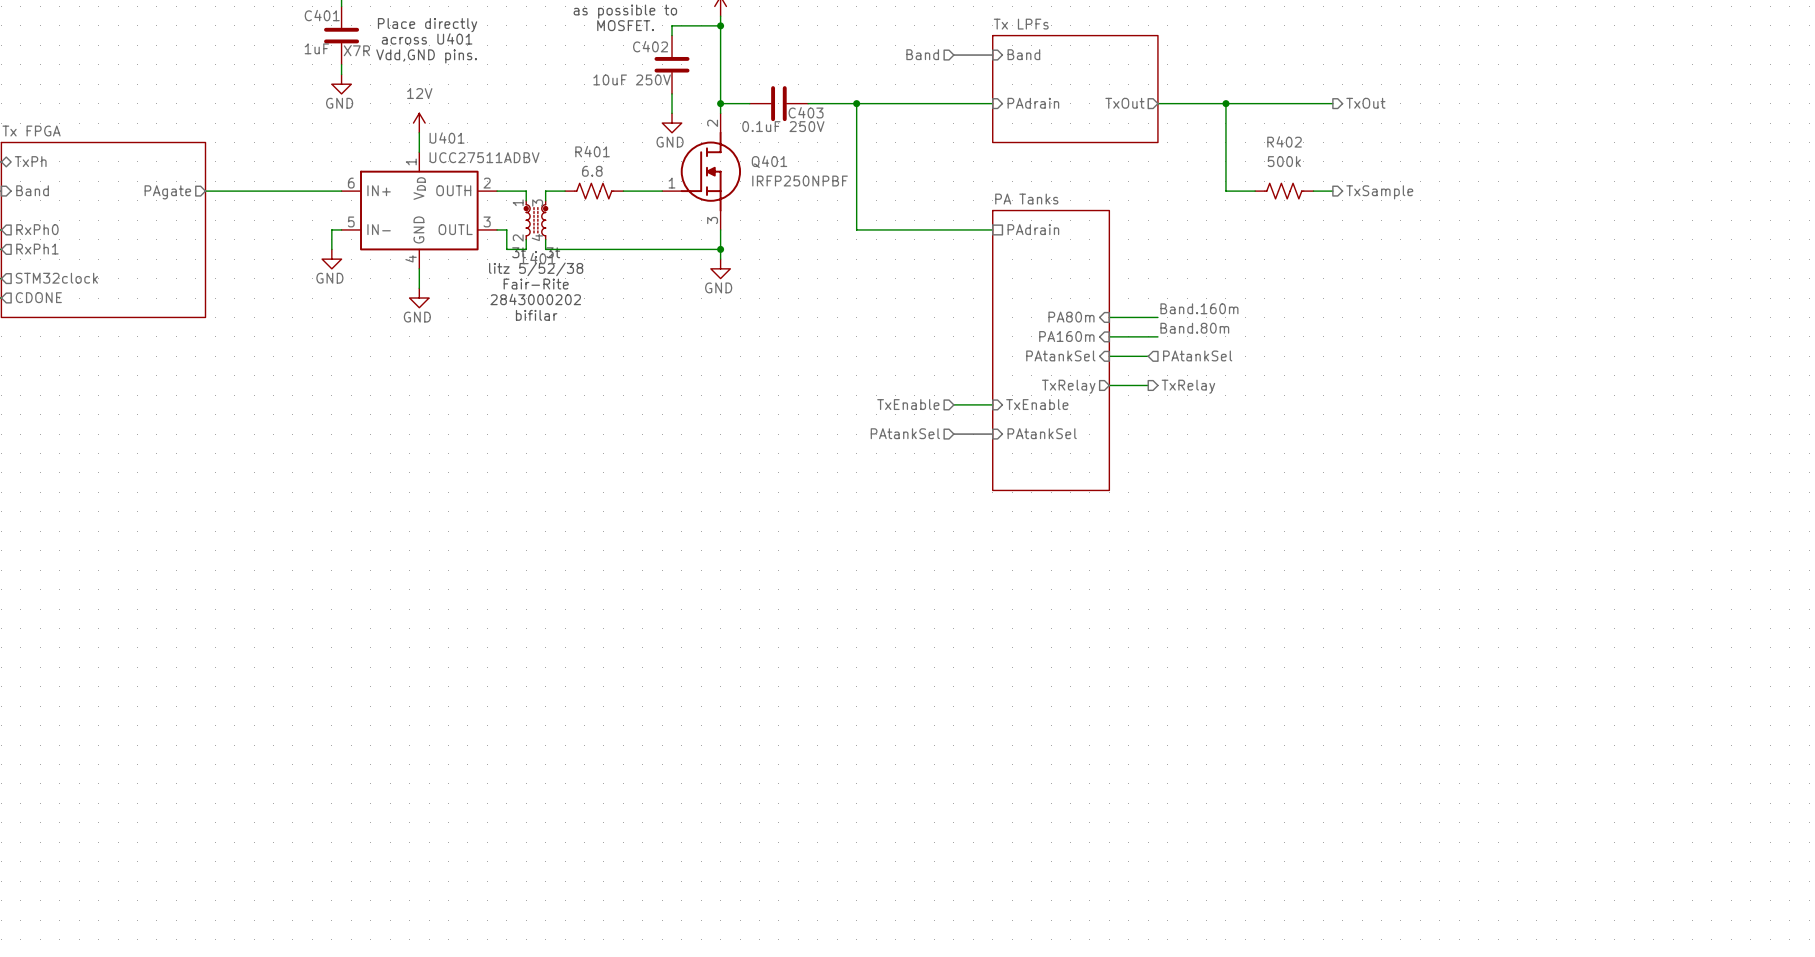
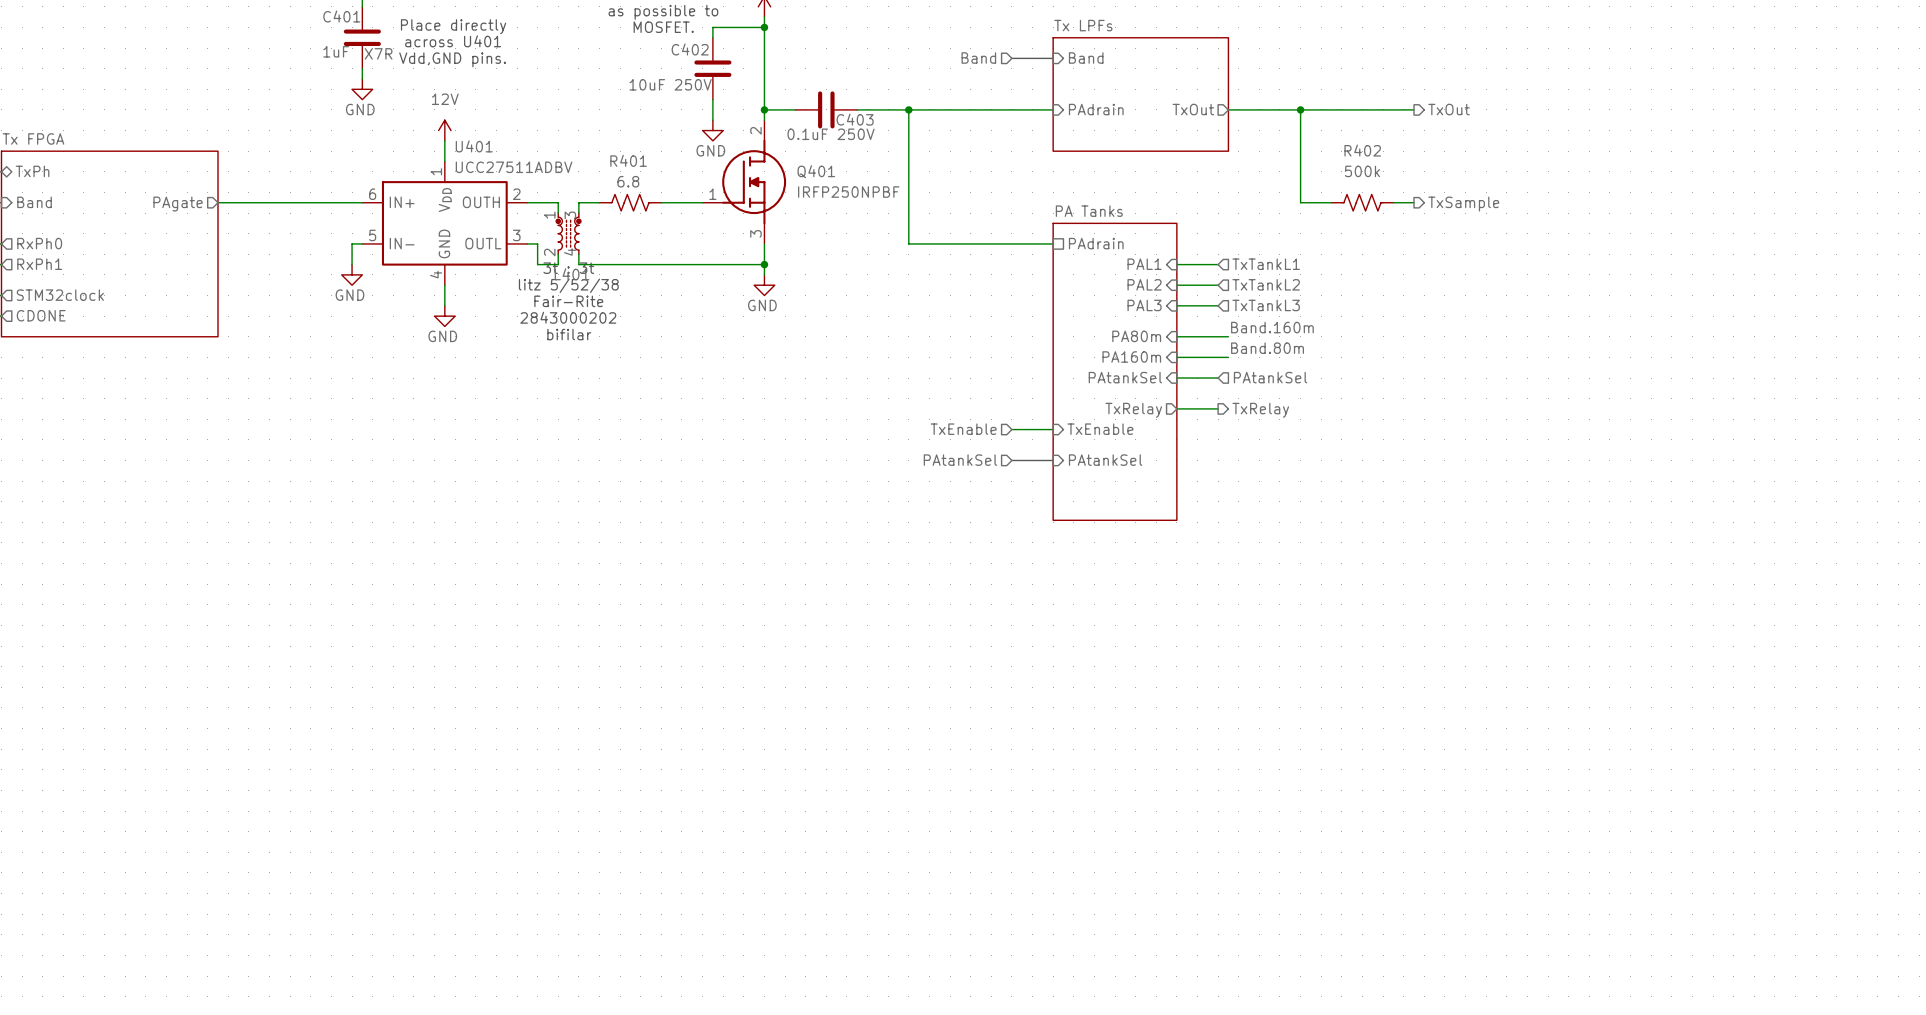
sheet pin: none -> PAL1 (1144, 264)
wire: none -> (1176, 264) (1218, 264)
hierarchical label: none -> TxTankL1 (1266, 264)
sheet pin: none -> PAL2 (1144, 284)
wire: none -> (1176, 285) (1218, 285)
hierarchical label: none -> TxTankL2 (1266, 284)
sheet pin: none -> PAL3 (1144, 305)
hierarchical label: none -> TxTankL3 (1266, 305)
wire: none -> (1176, 305) (1218, 305)

